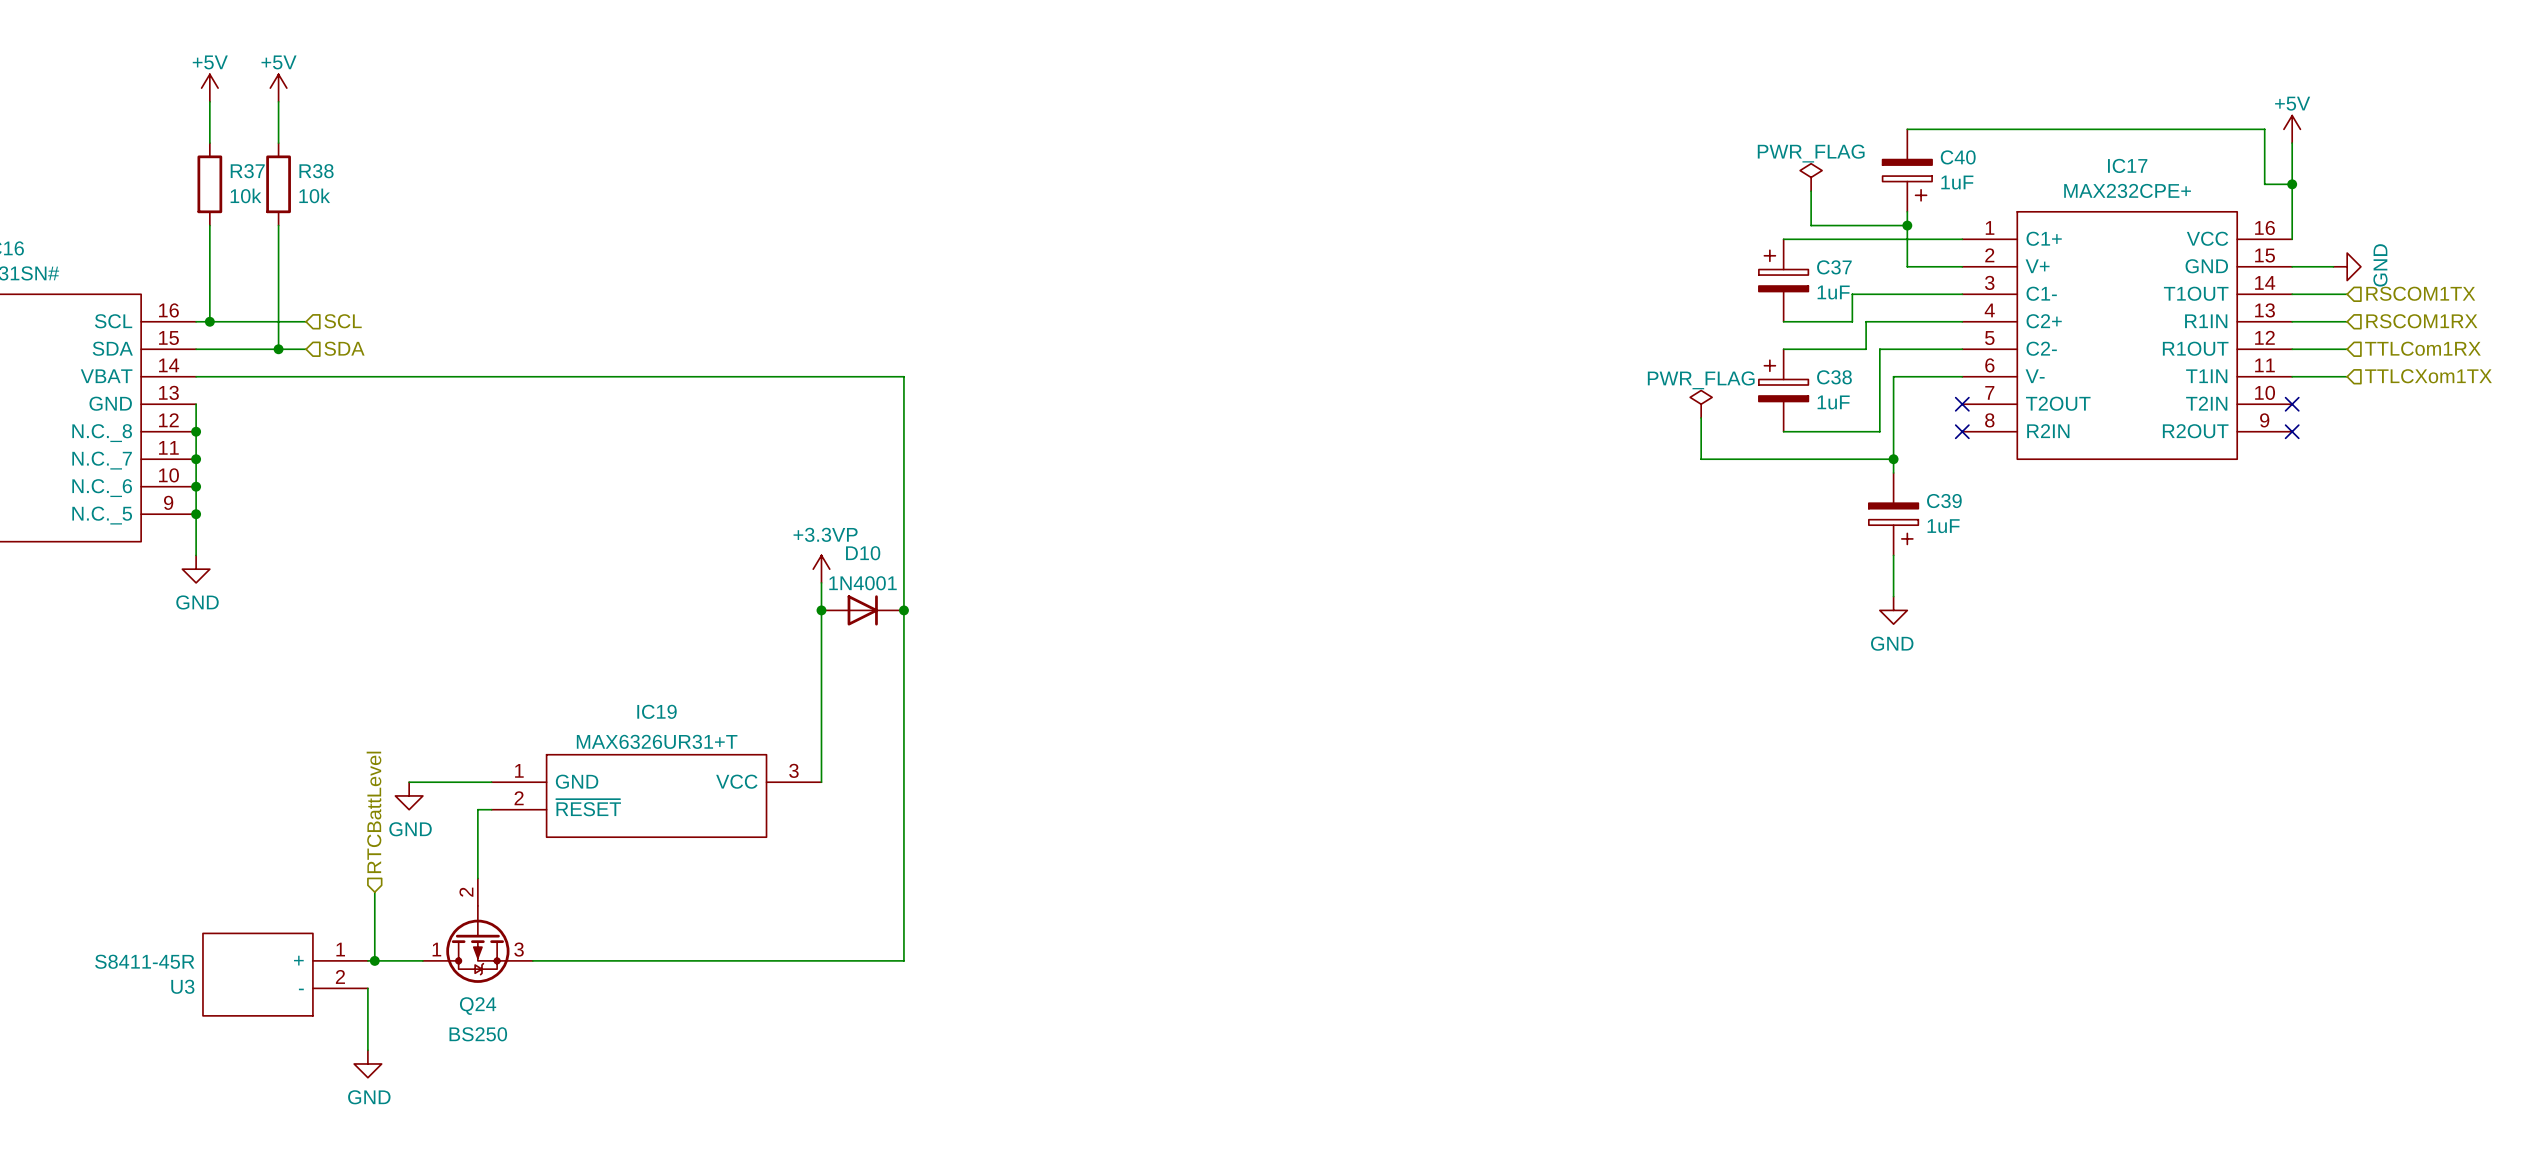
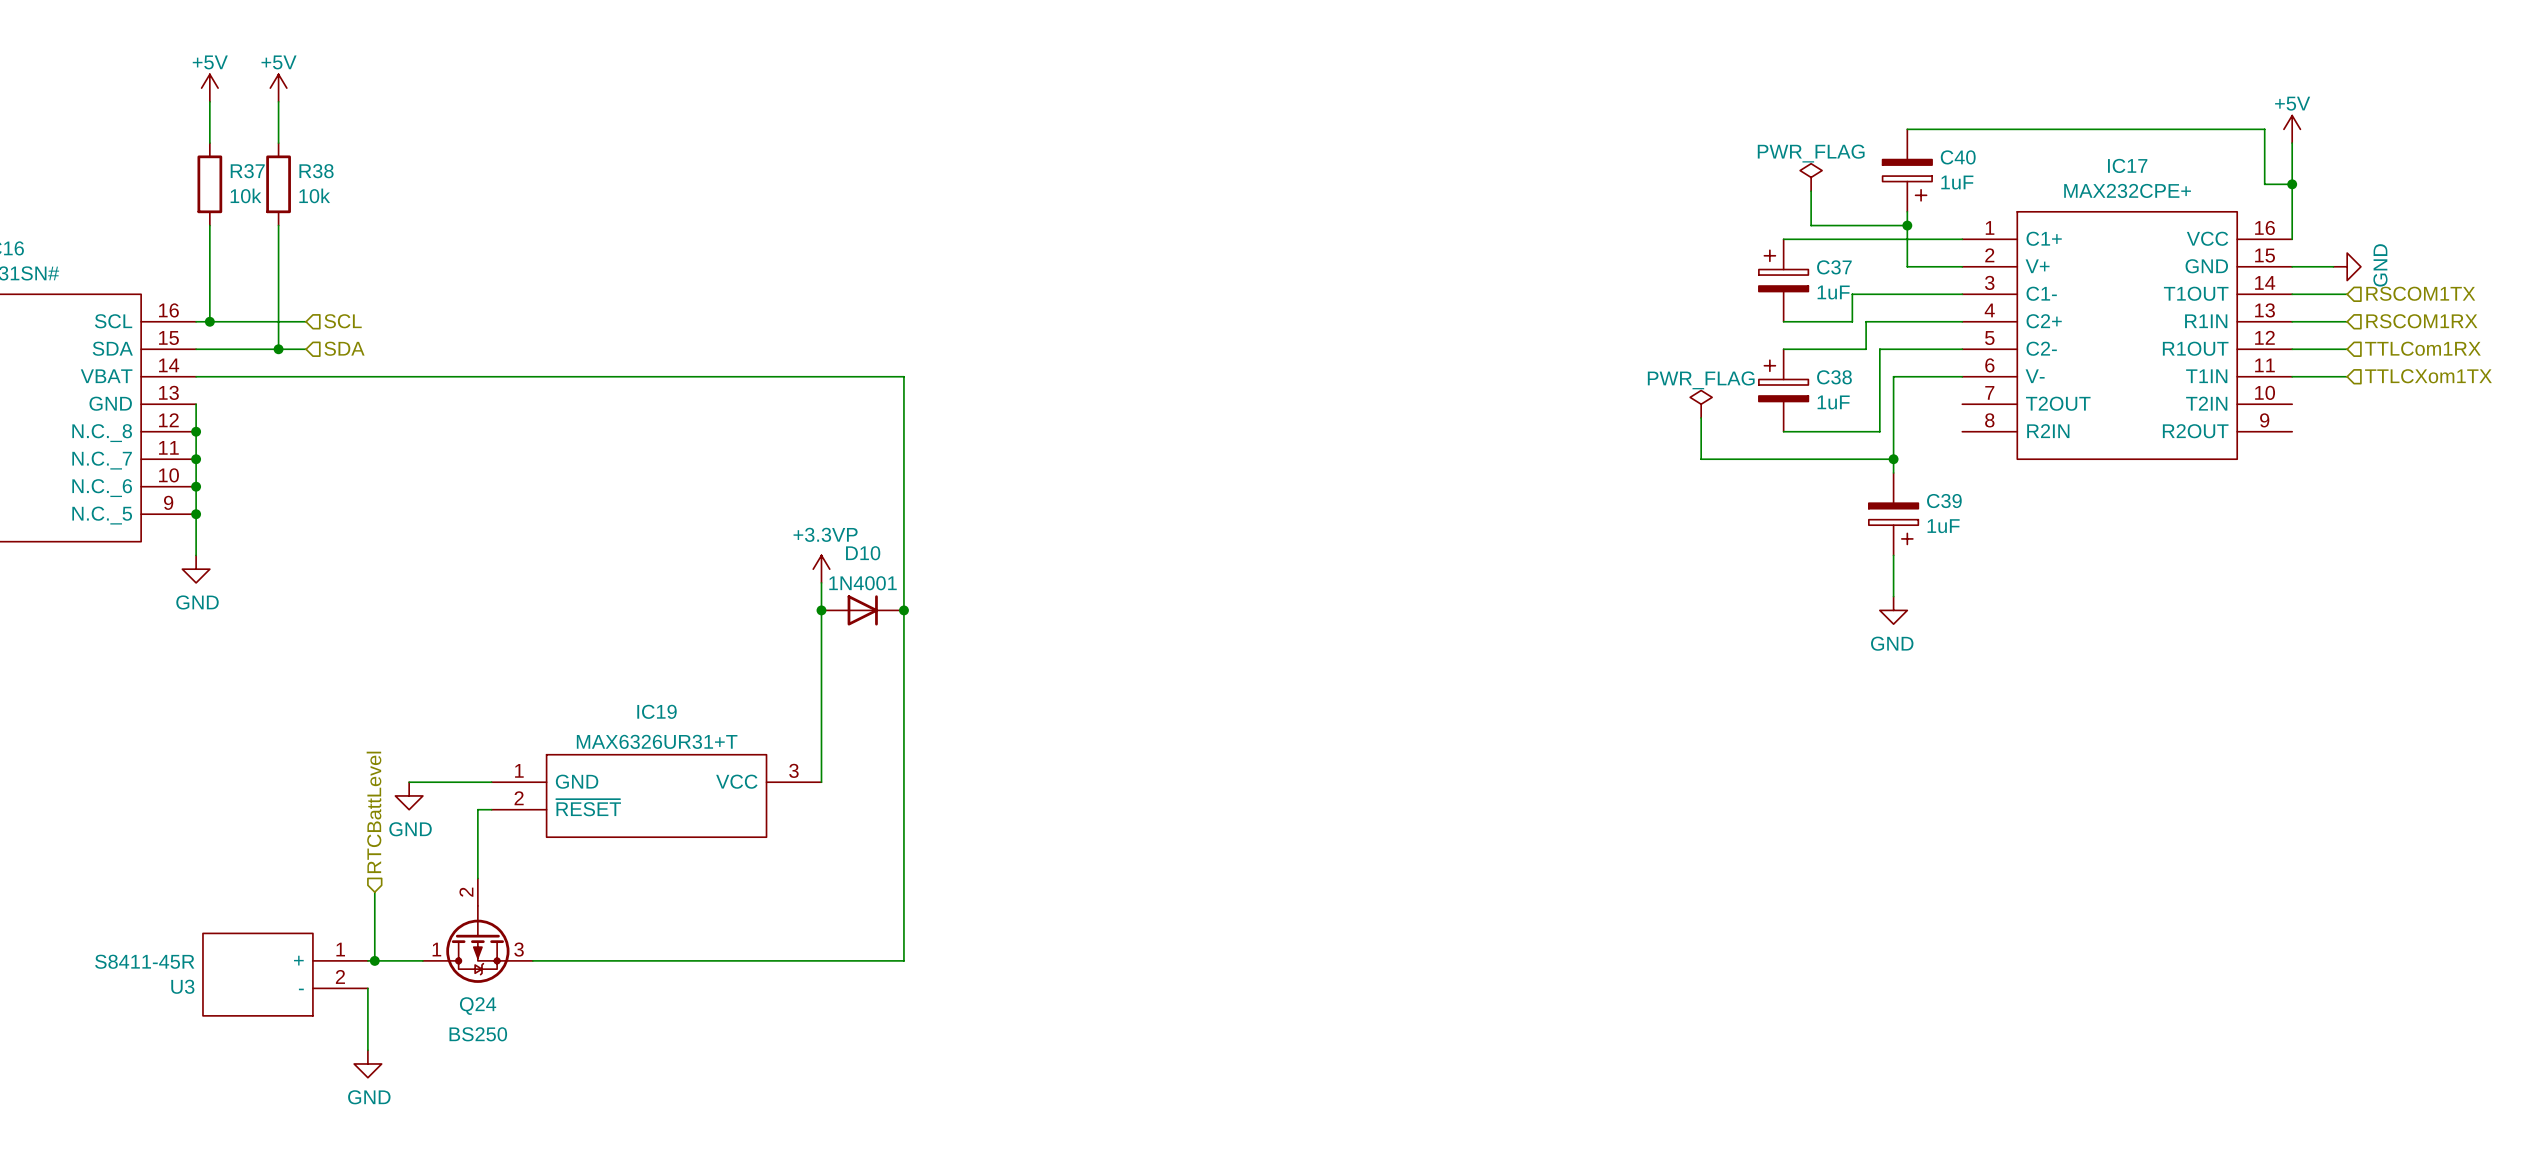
no-connect mark: (1962, 404) -> none
no-connect mark: (2292, 404) -> none
no-connect mark: (1962, 431) -> none
no-connect mark: (2292, 431) -> none

